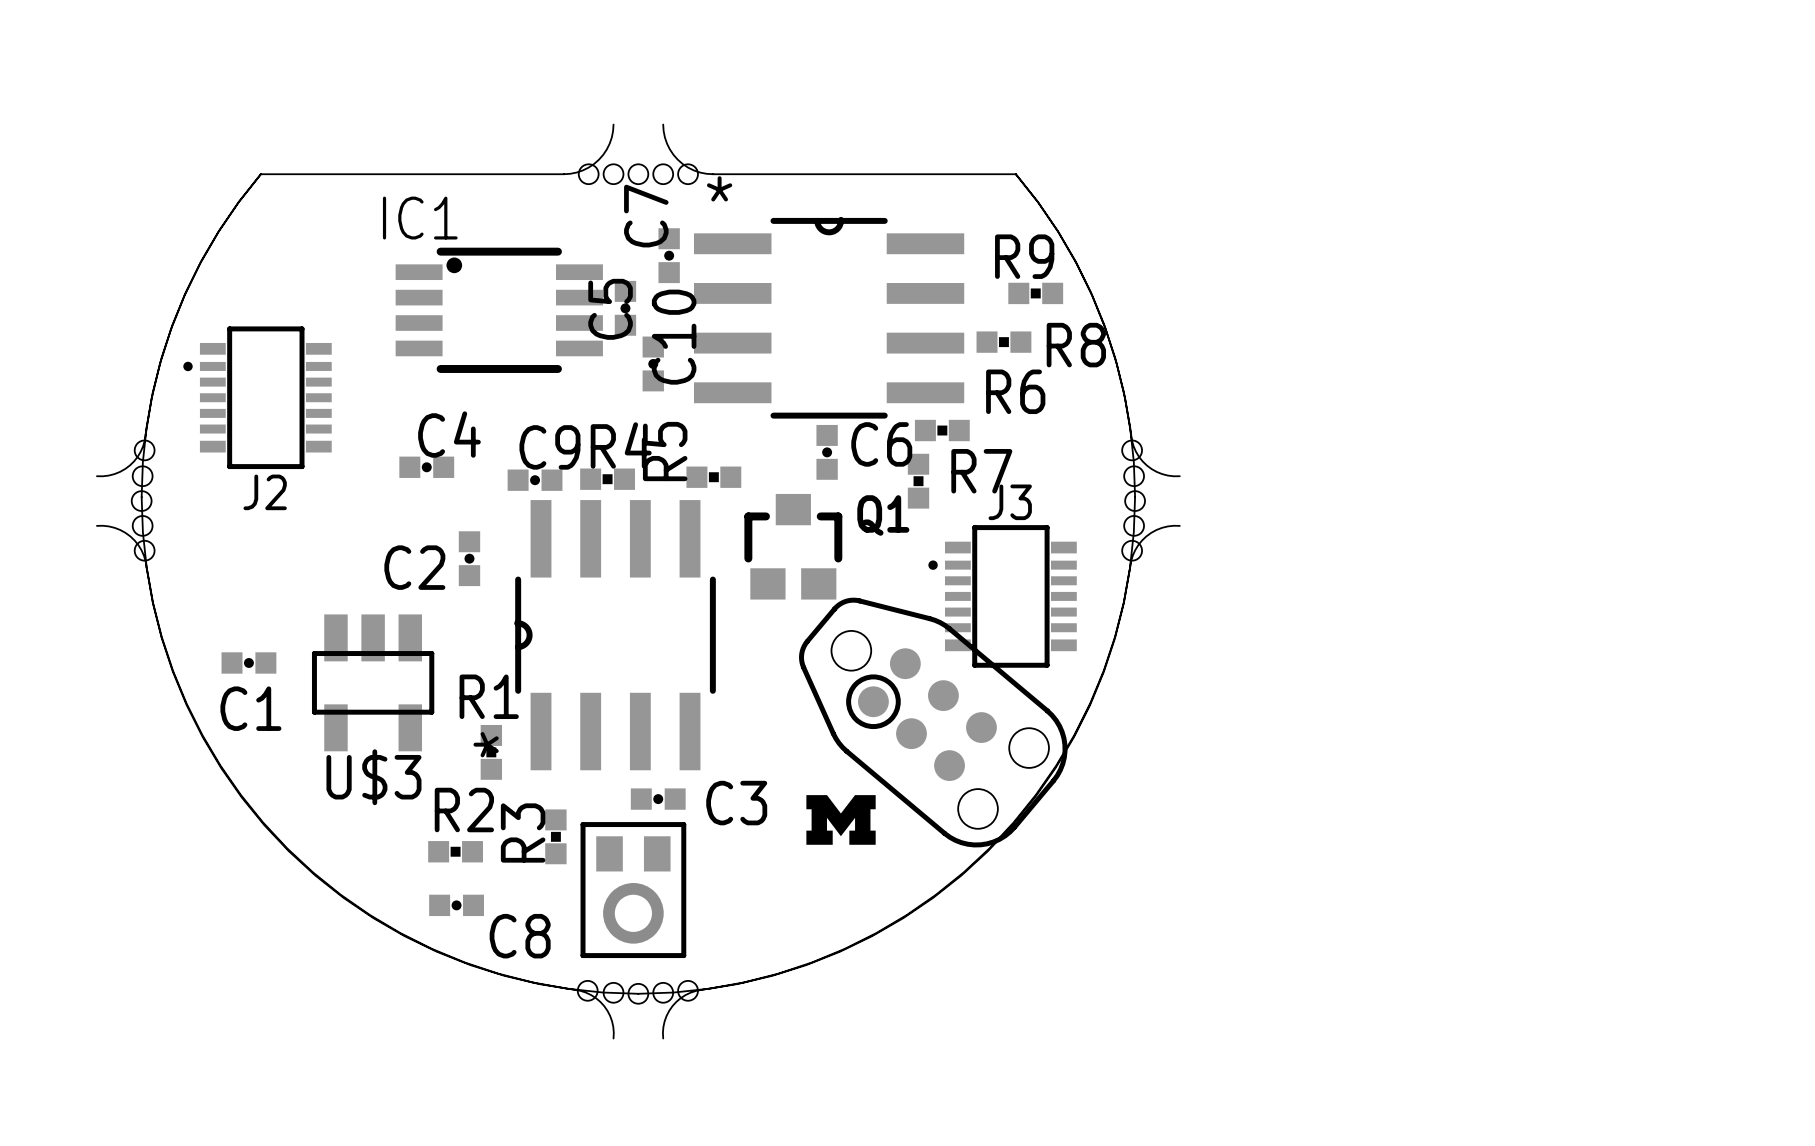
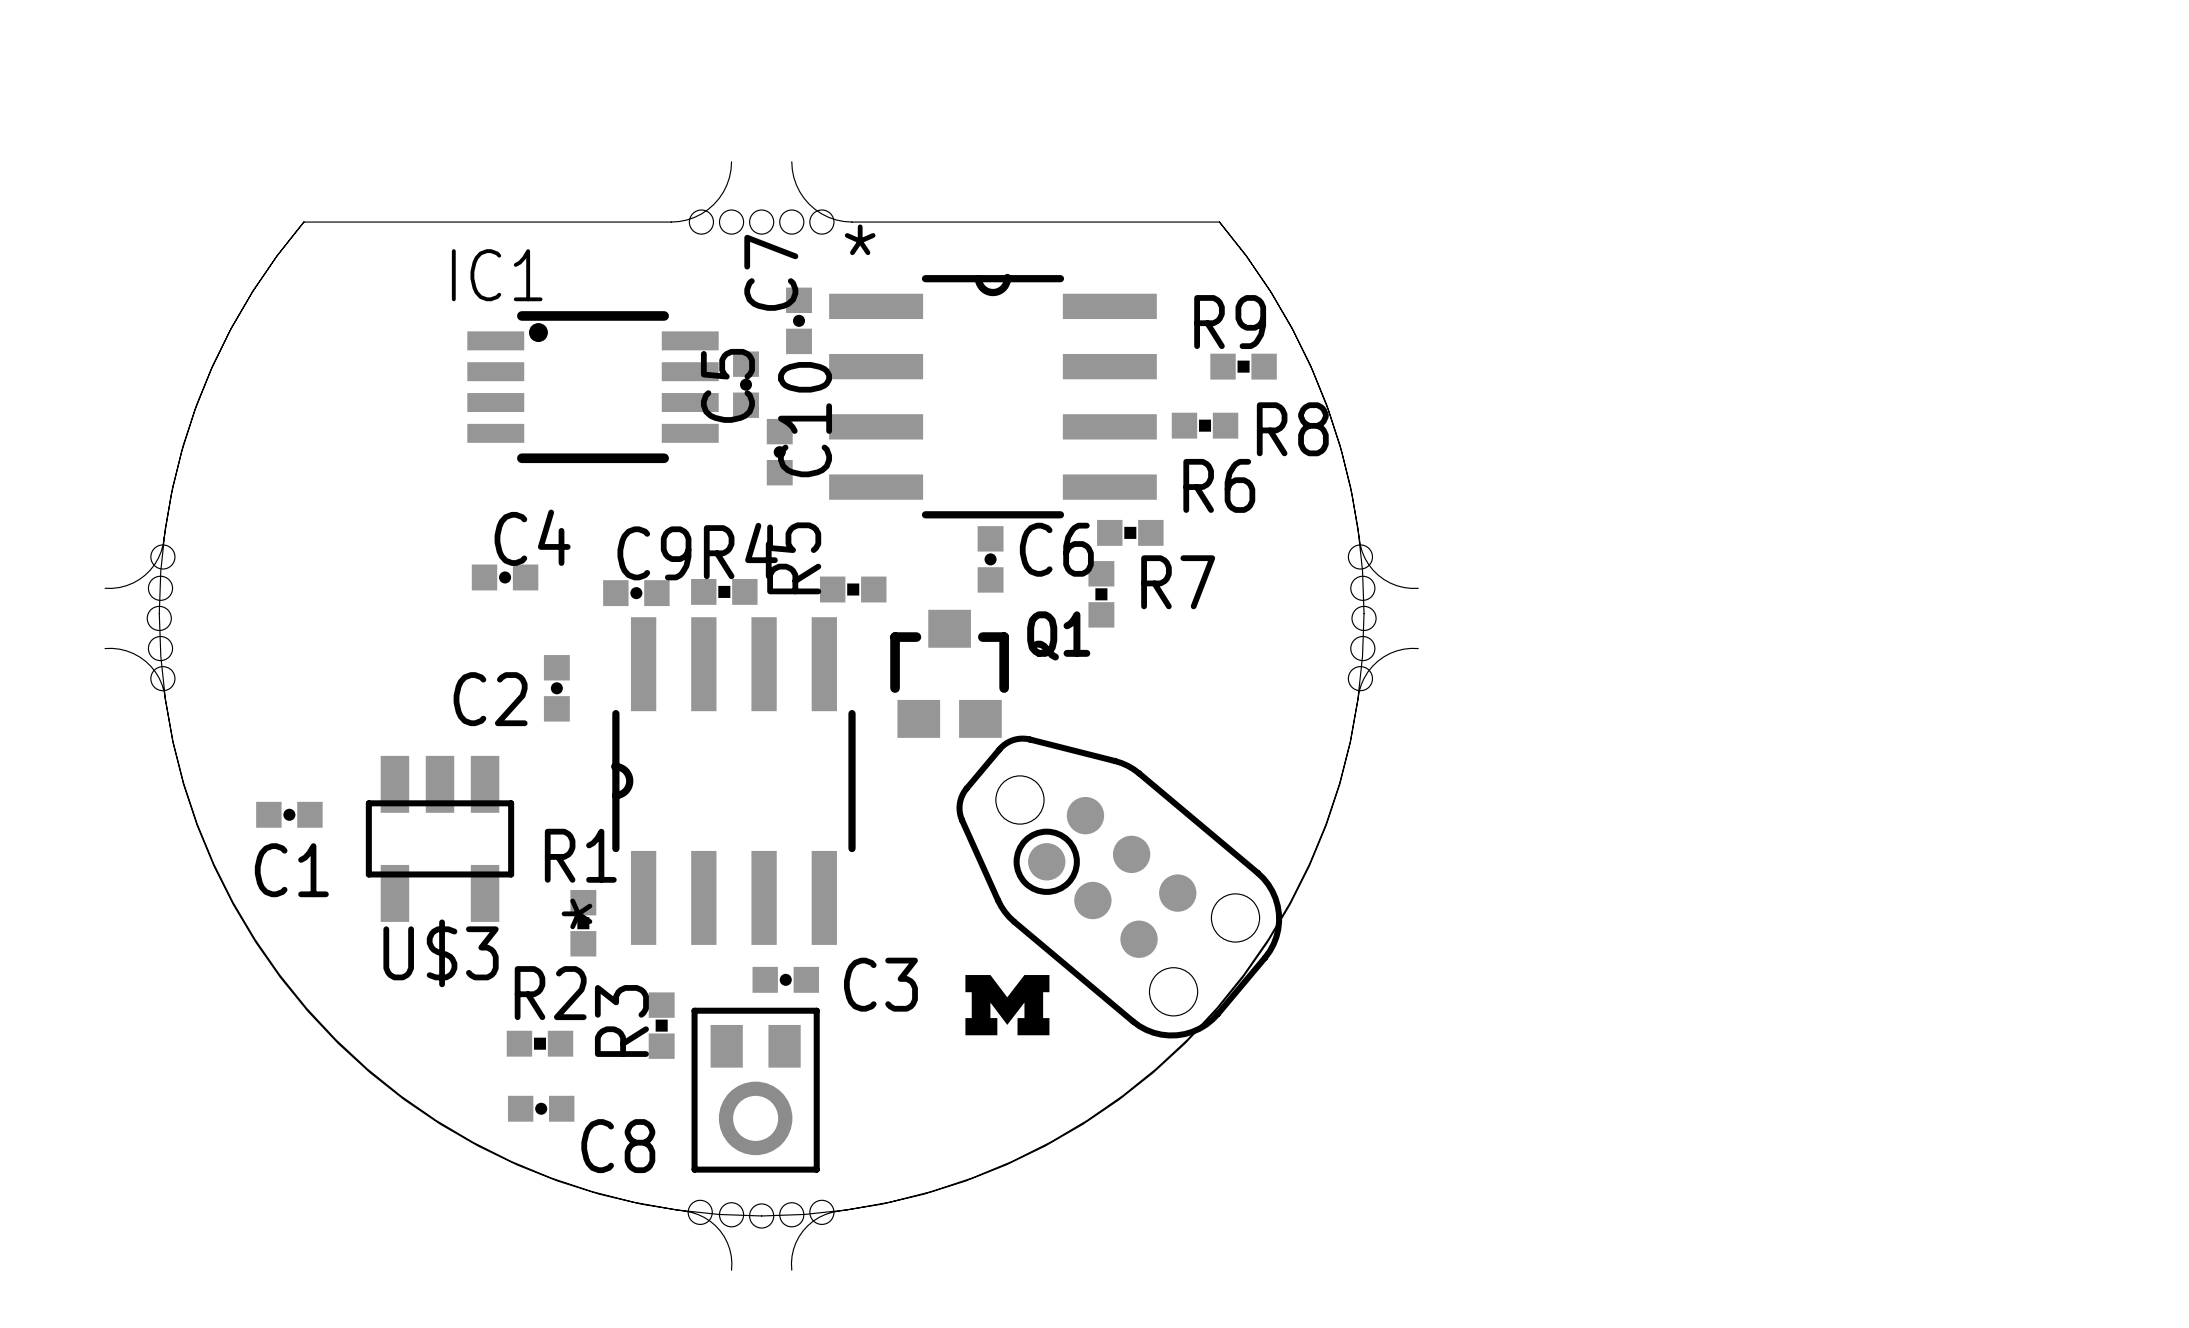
J2: (257, 397) -> none
J3: (1002, 596) -> none

